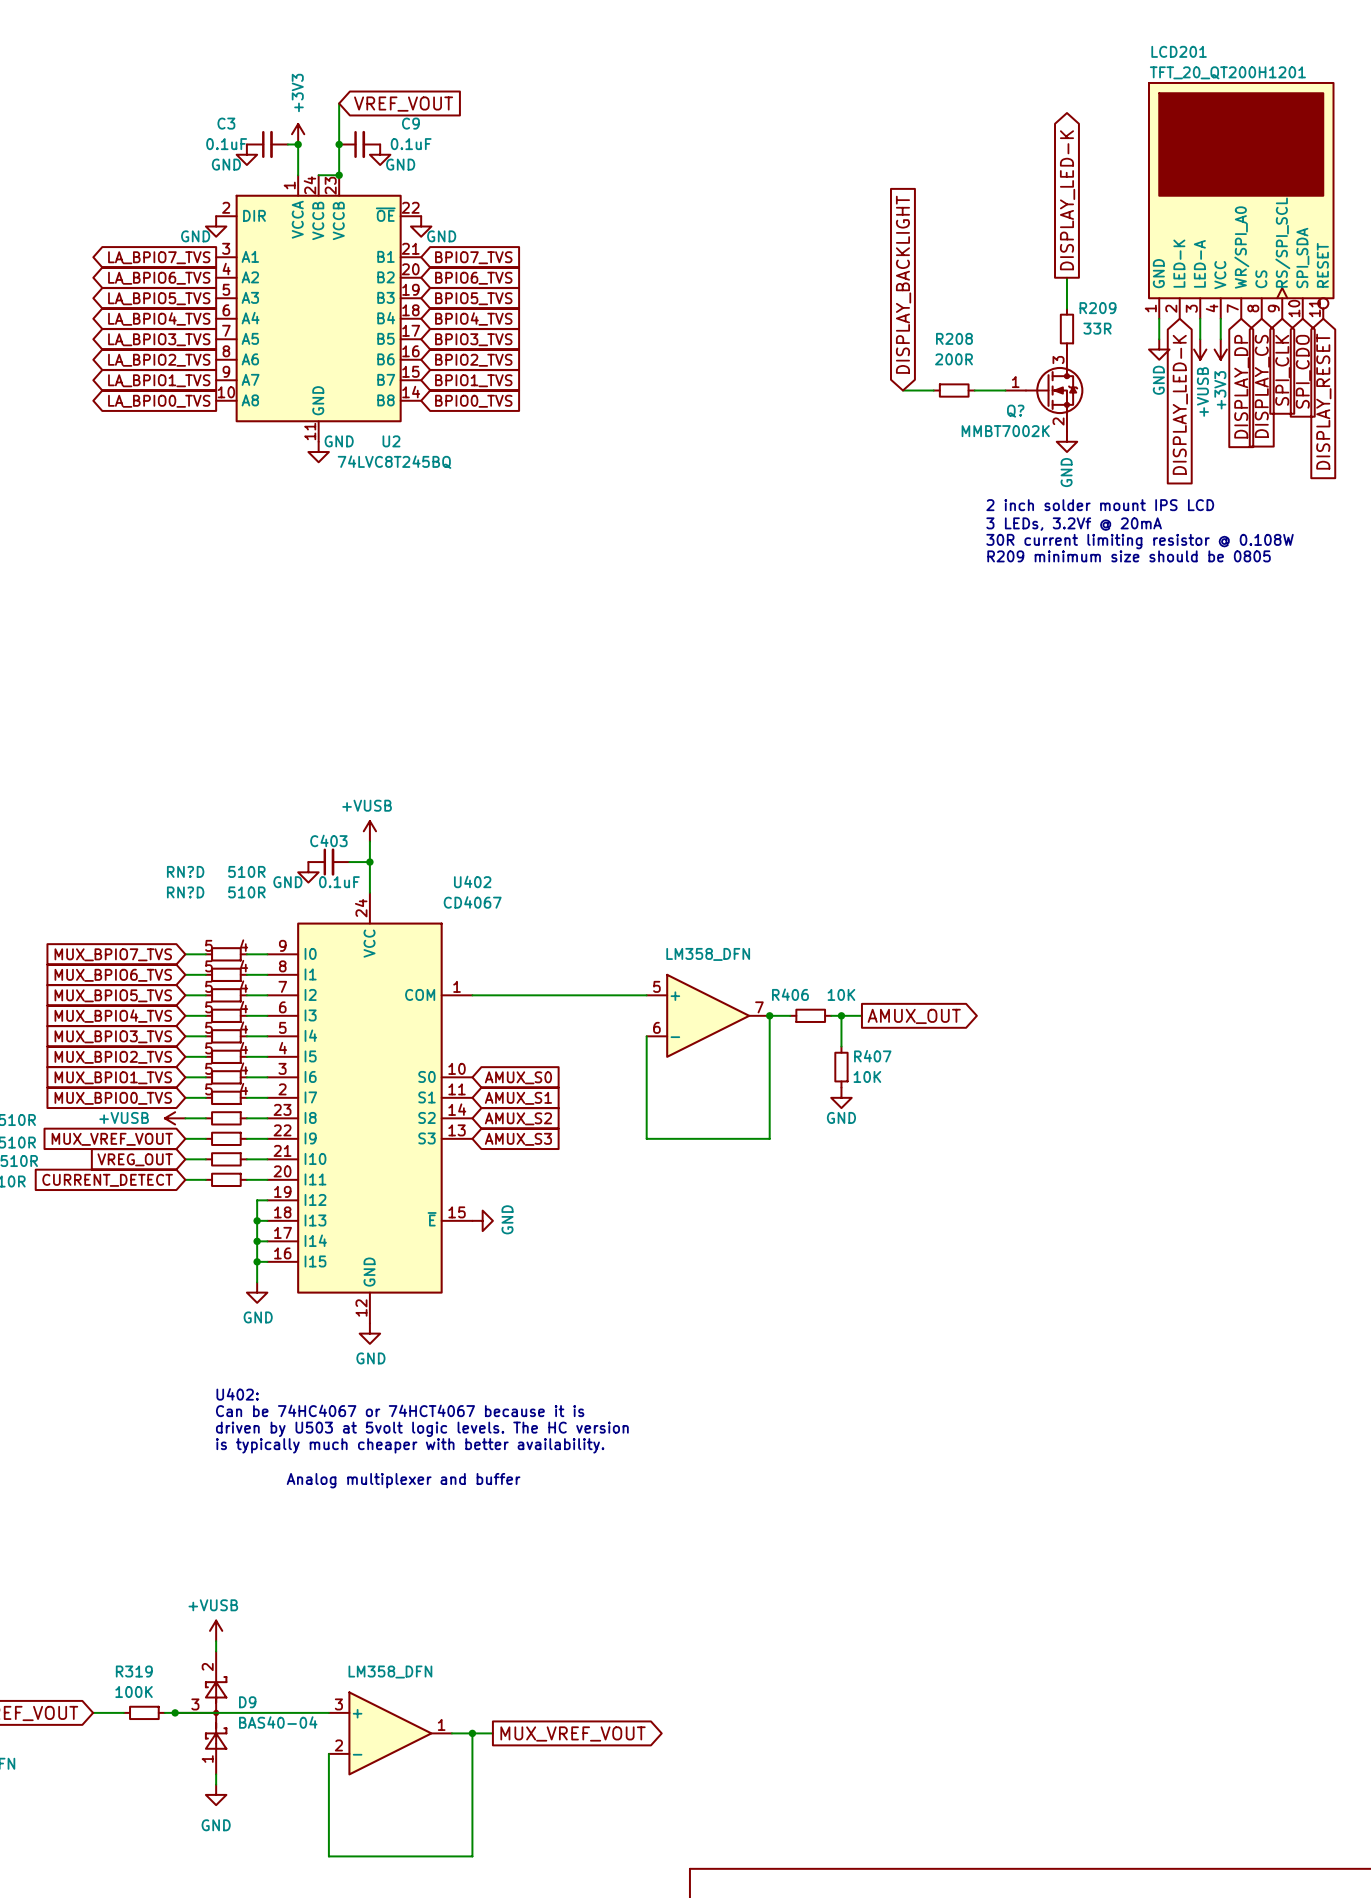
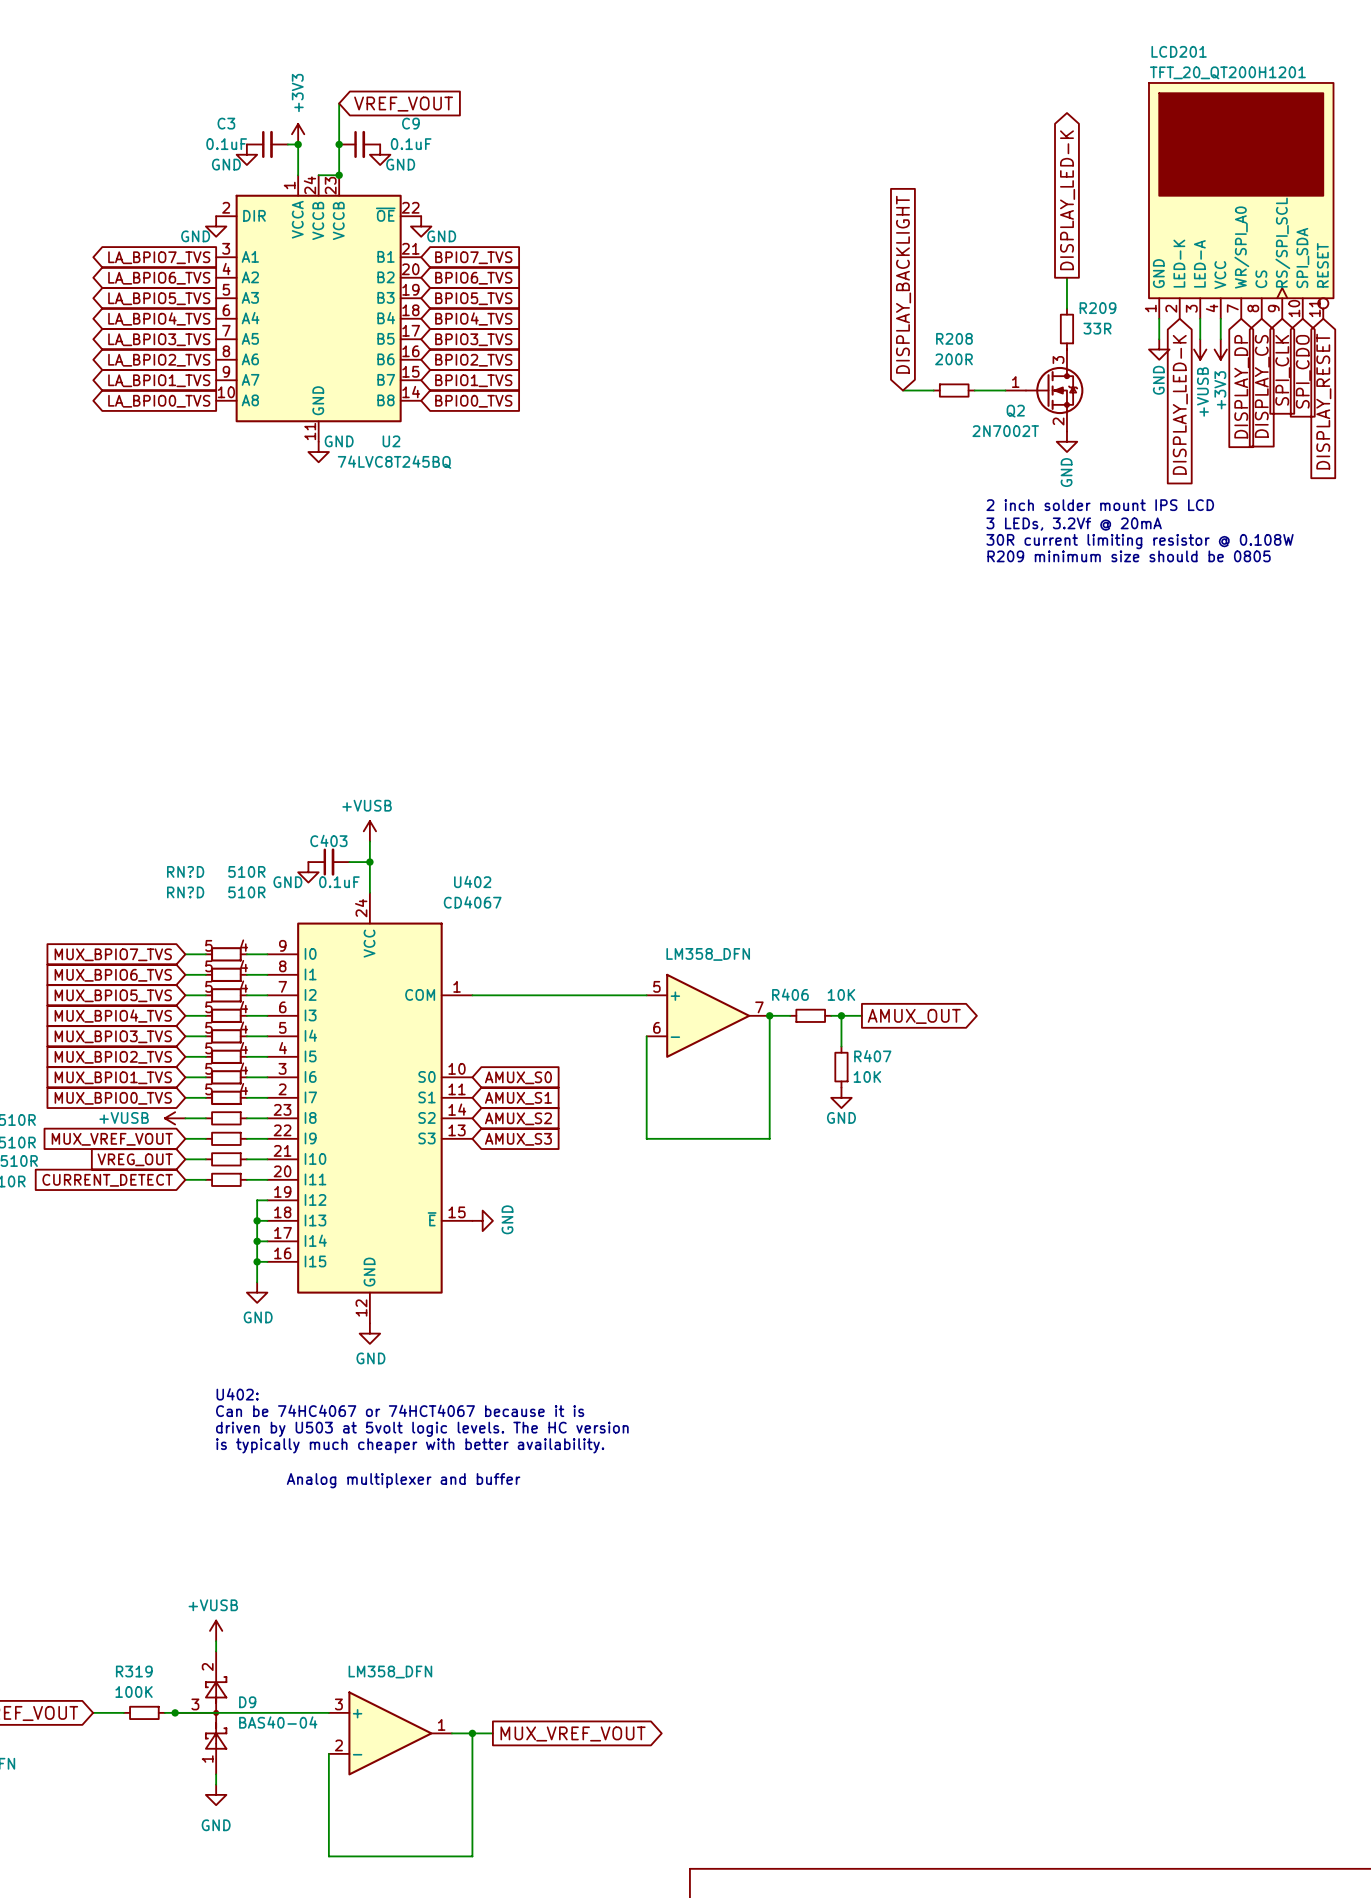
Q? name: Q? (1015, 411) -> Q2 (1015, 411)
Q? value: MMBT7002K (1005, 431) -> 2N7002T (1005, 431)

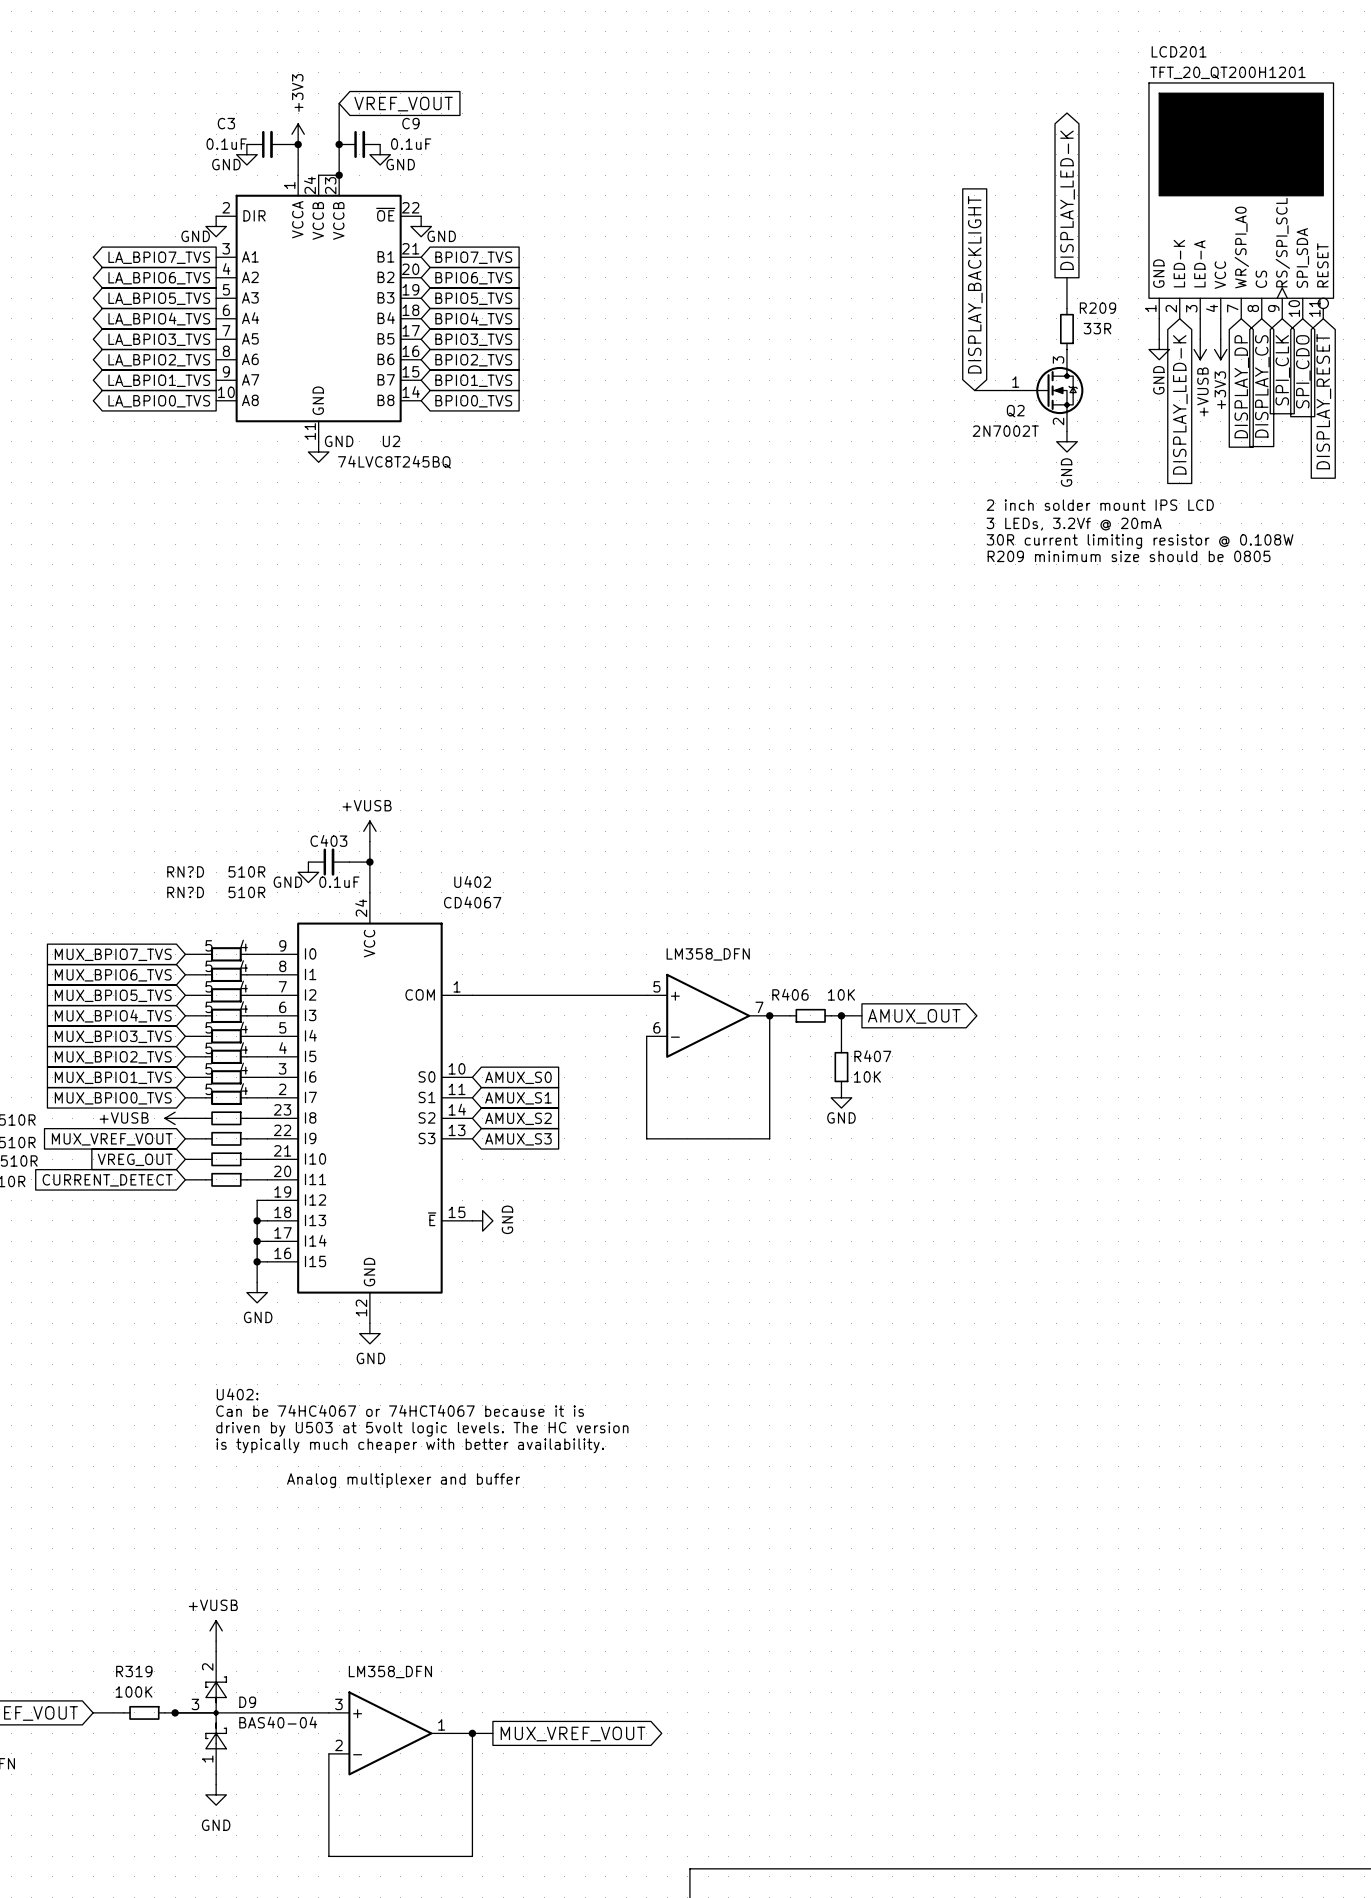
global label position: DISPLAY_BACKLIGHT (903, 284) -> DISPLAY_BACKLIGHT (975, 284)
wire: (902, 390) (933, 390) -> none
R208: 200R (954, 390) -> none

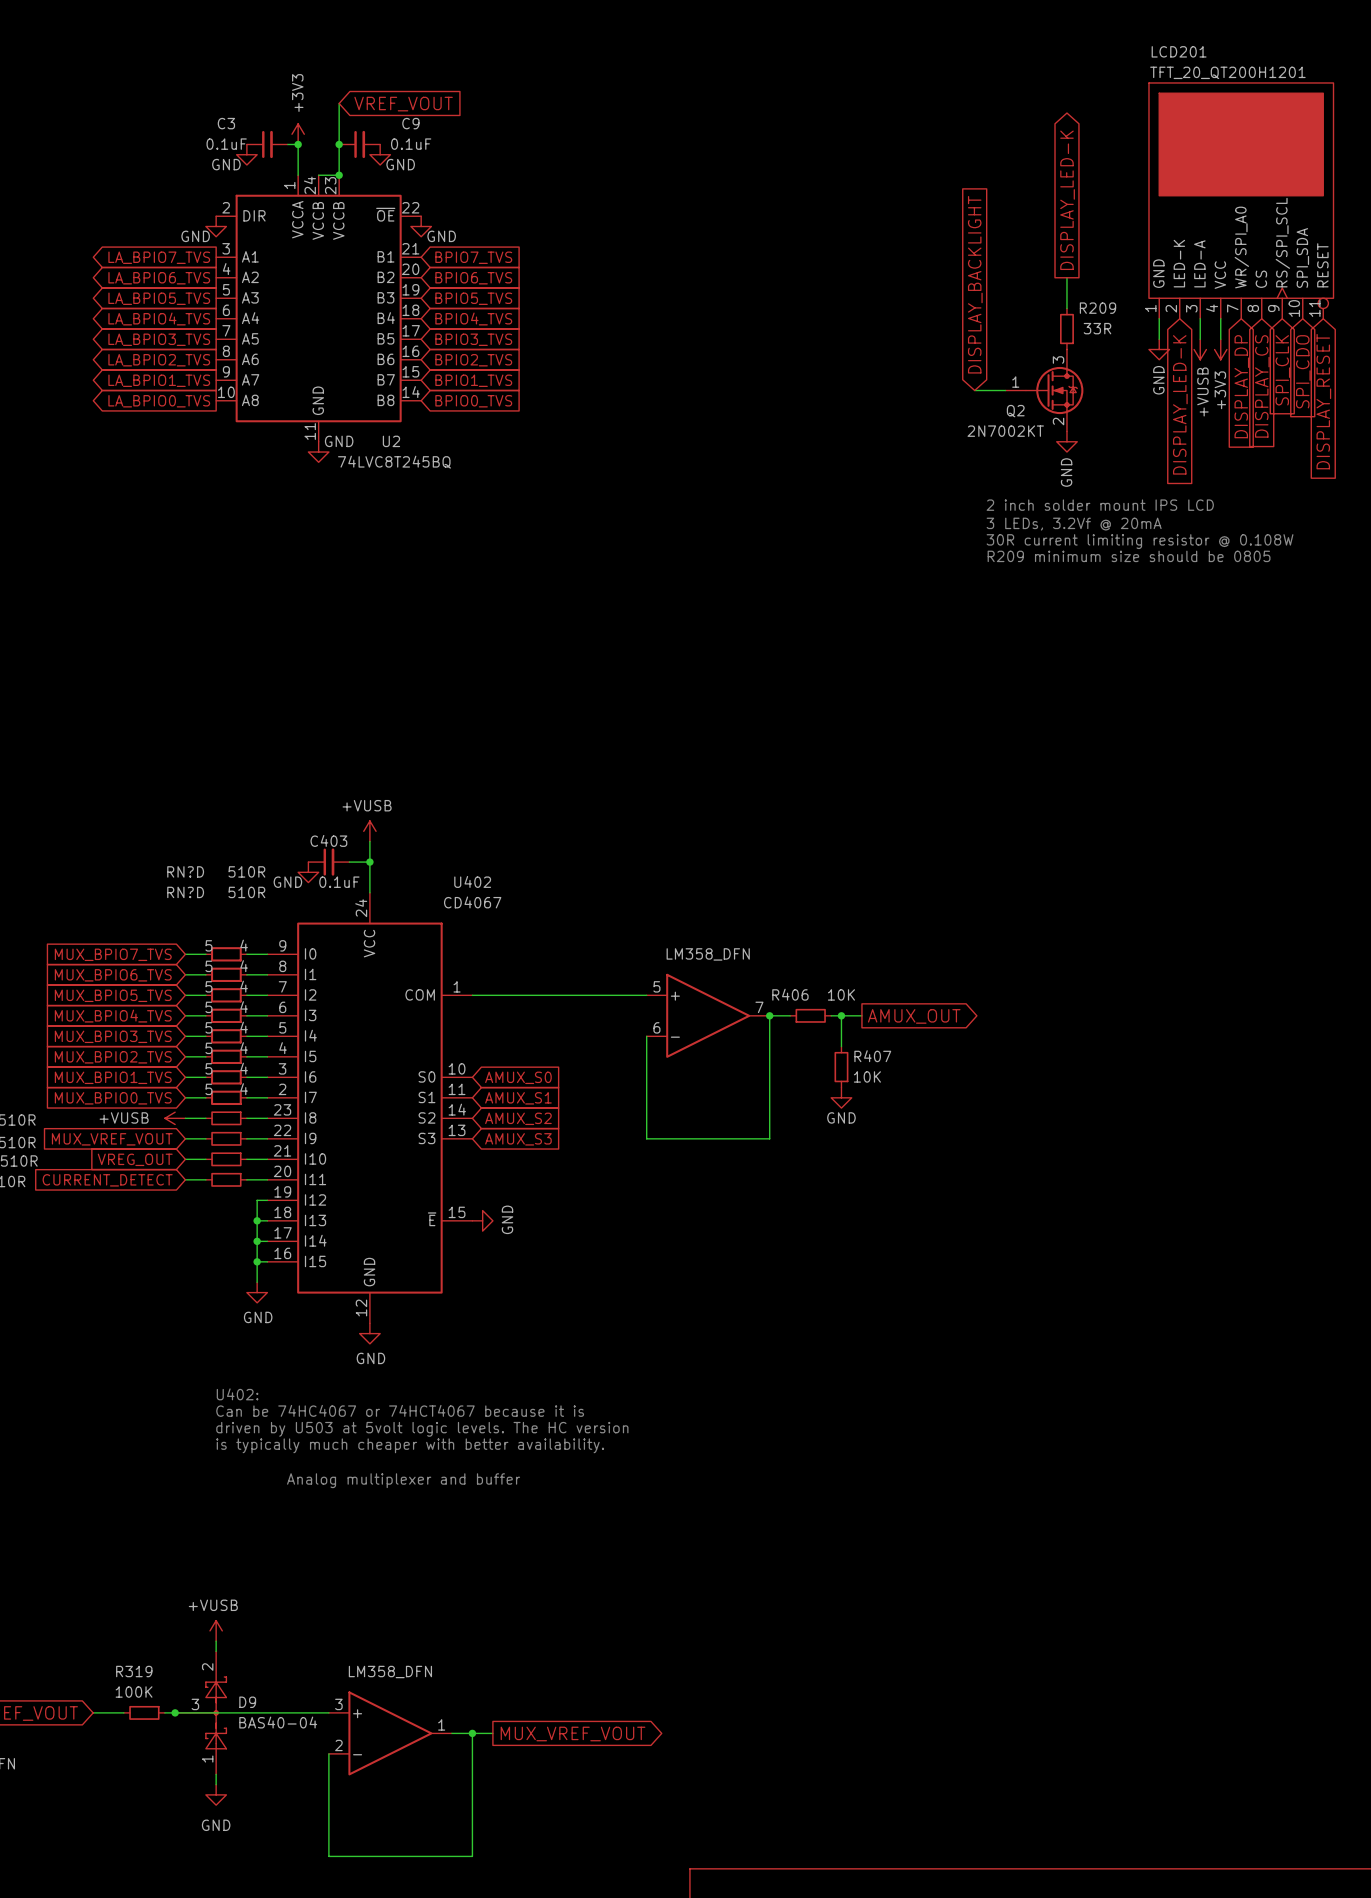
Q2 value: 2N7002T (1005, 431) -> 2N7002KT (1005, 431)

